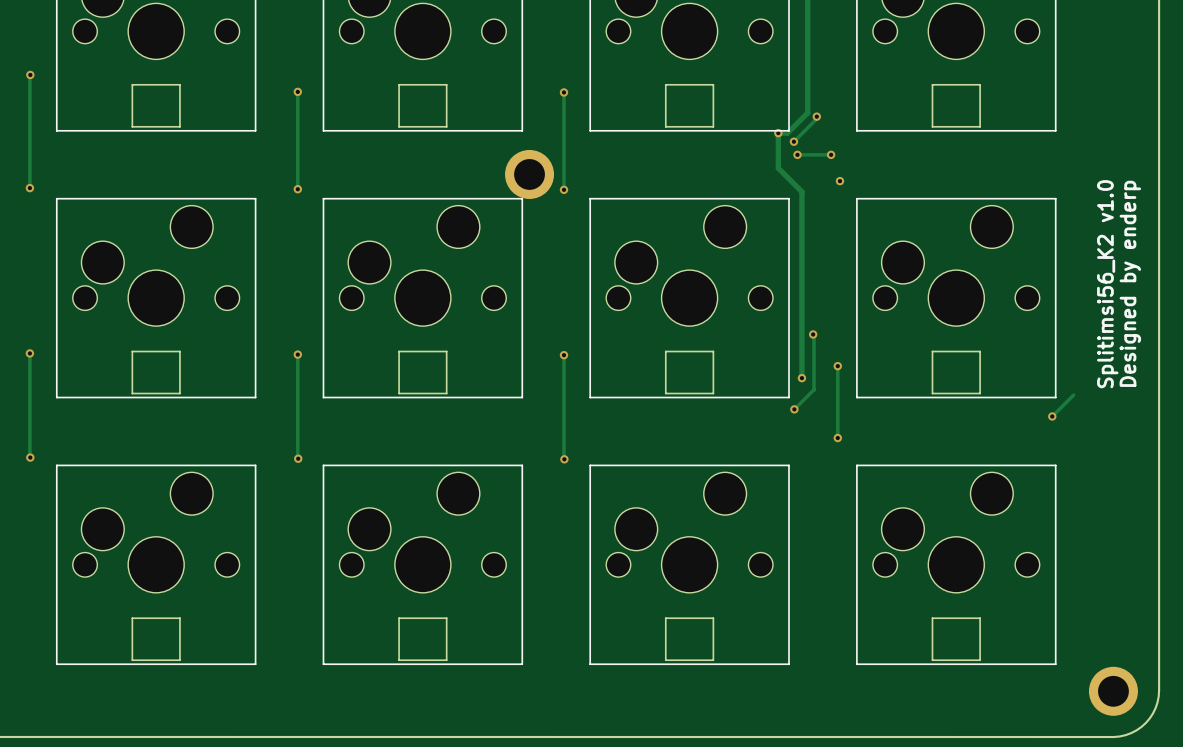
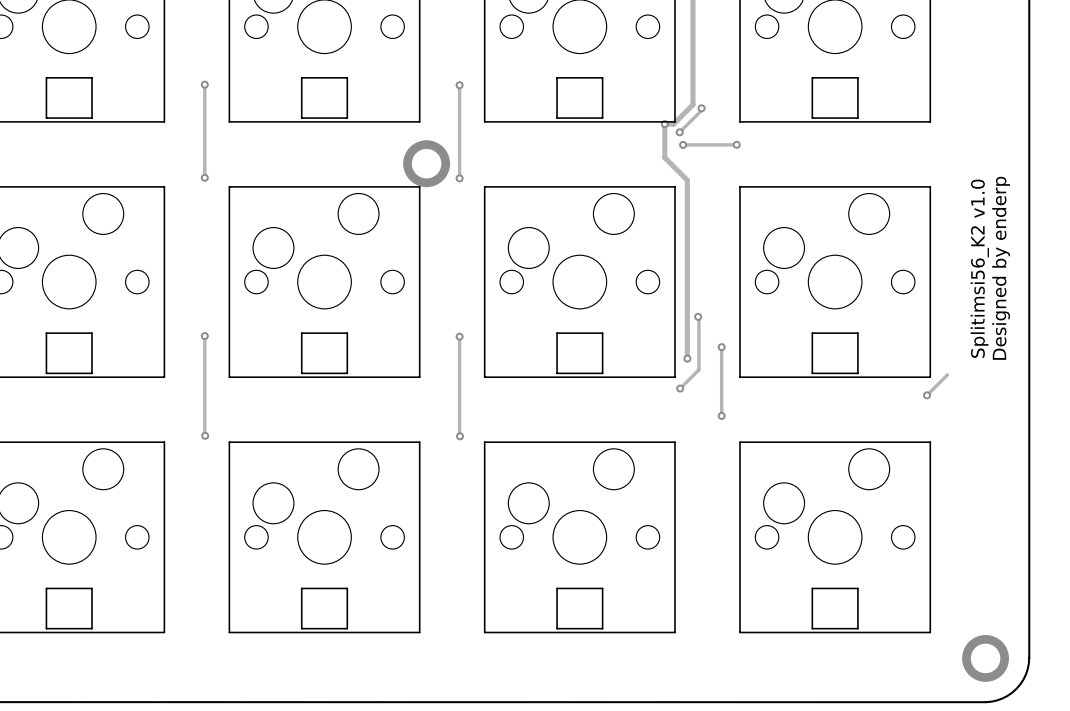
track: none -> (715, 144) (736, 144)
via: (831, 154) -> none
via: none -> (736, 144)
via: (839, 181) -> none

